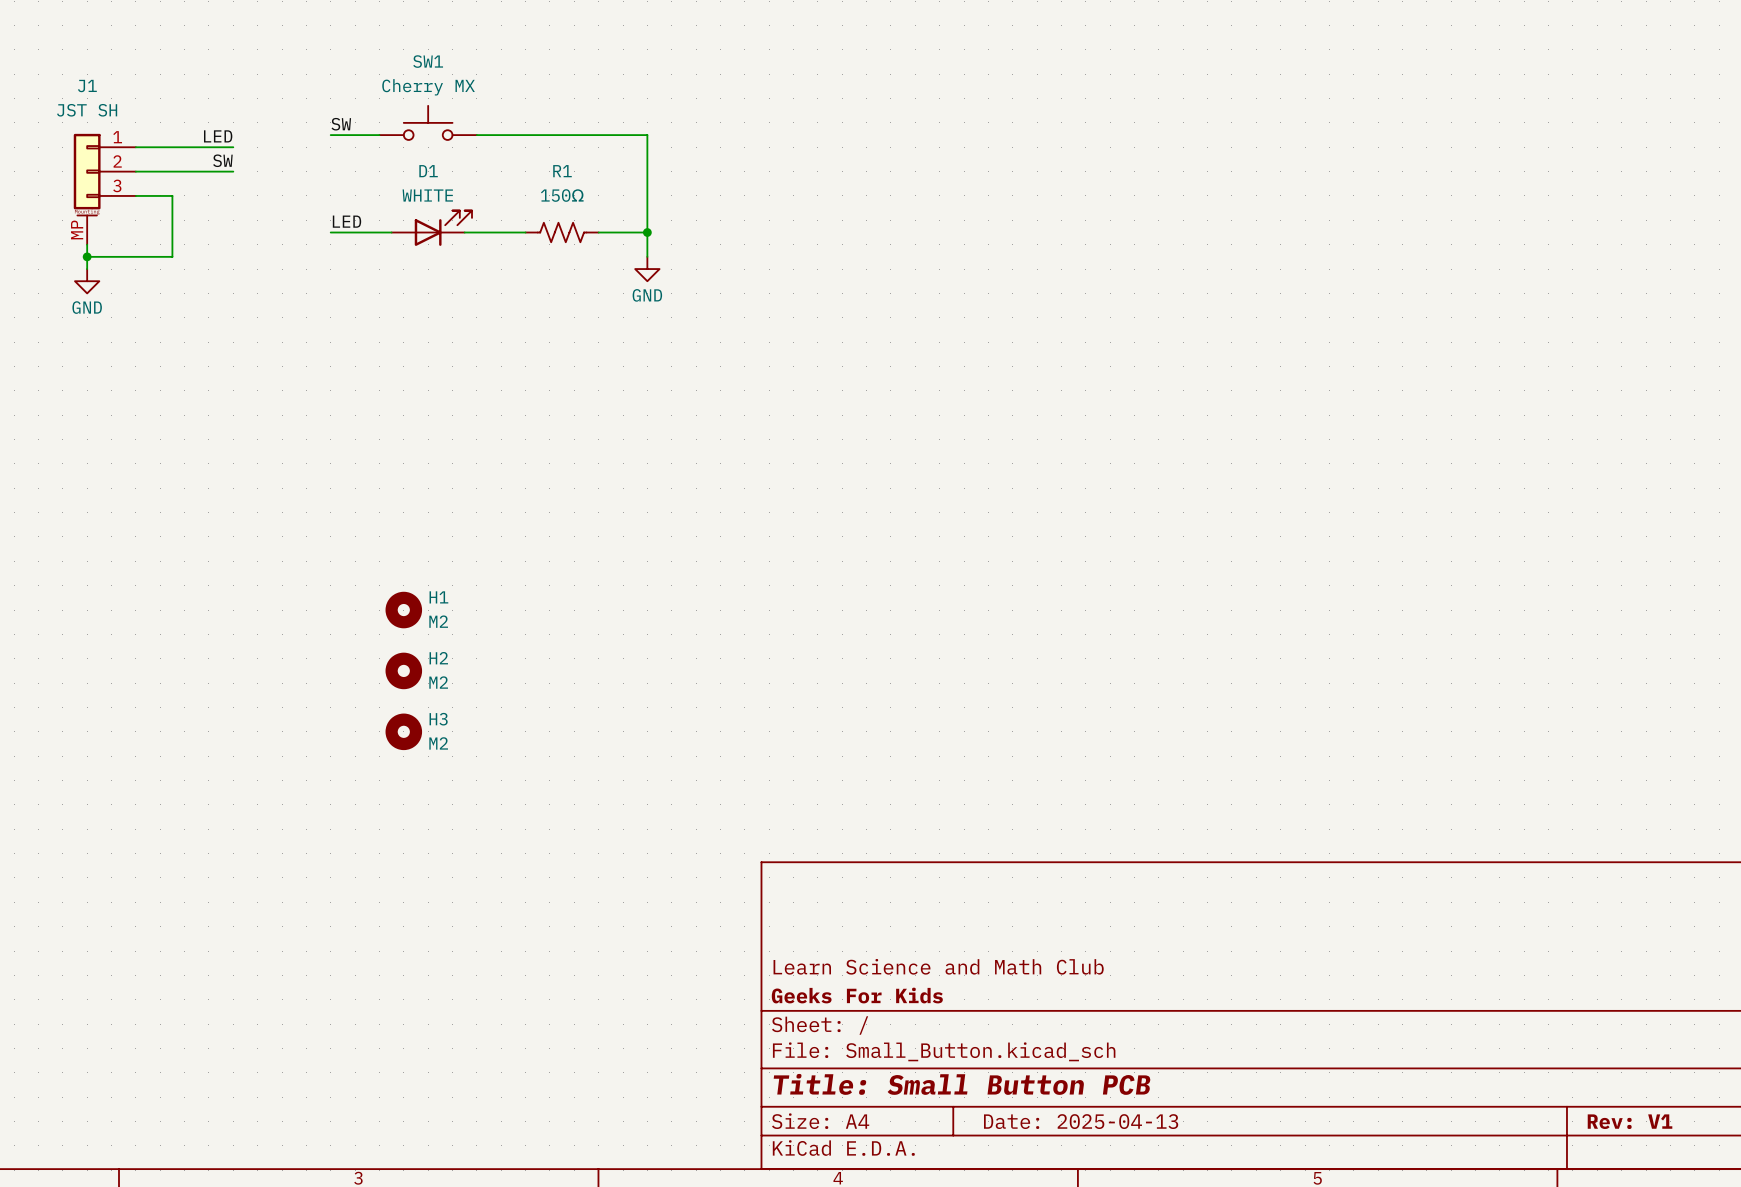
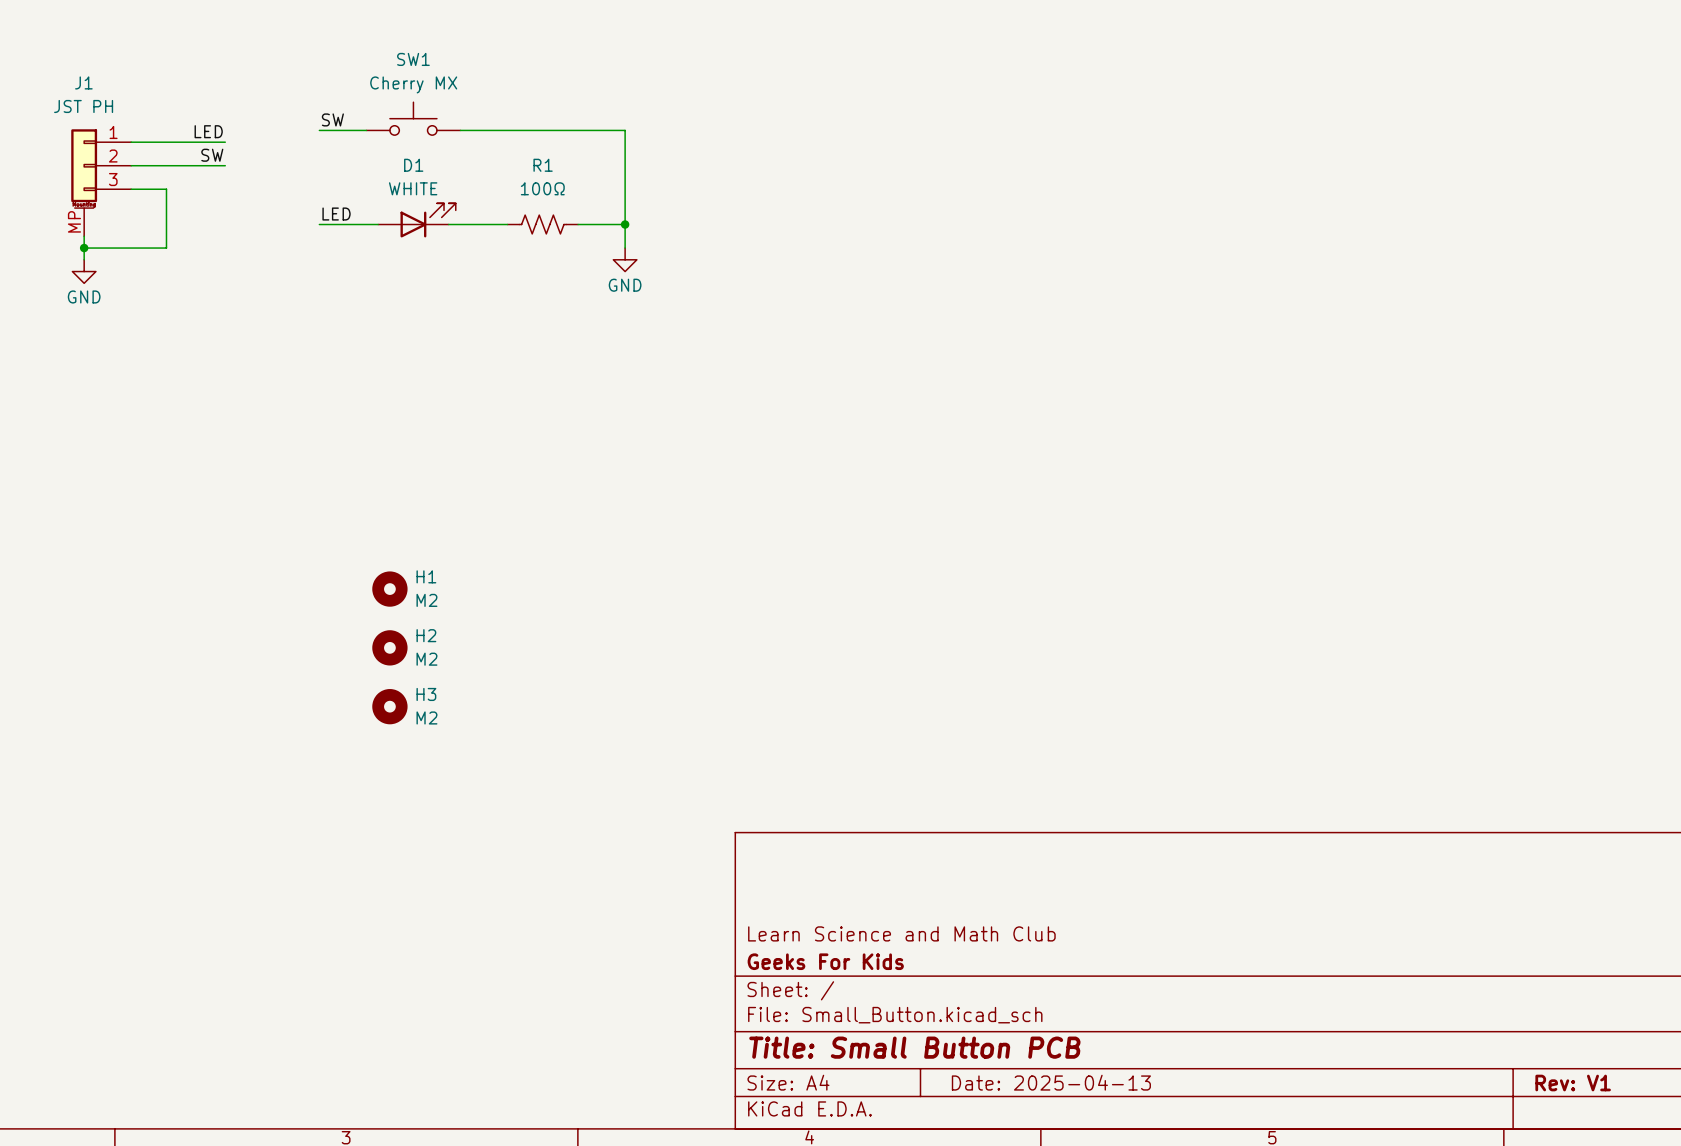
J1 value: JST SH (87, 110) -> JST PH (83, 106)
R1 value: 150Ω (562, 195) -> 100Ω (542, 188)

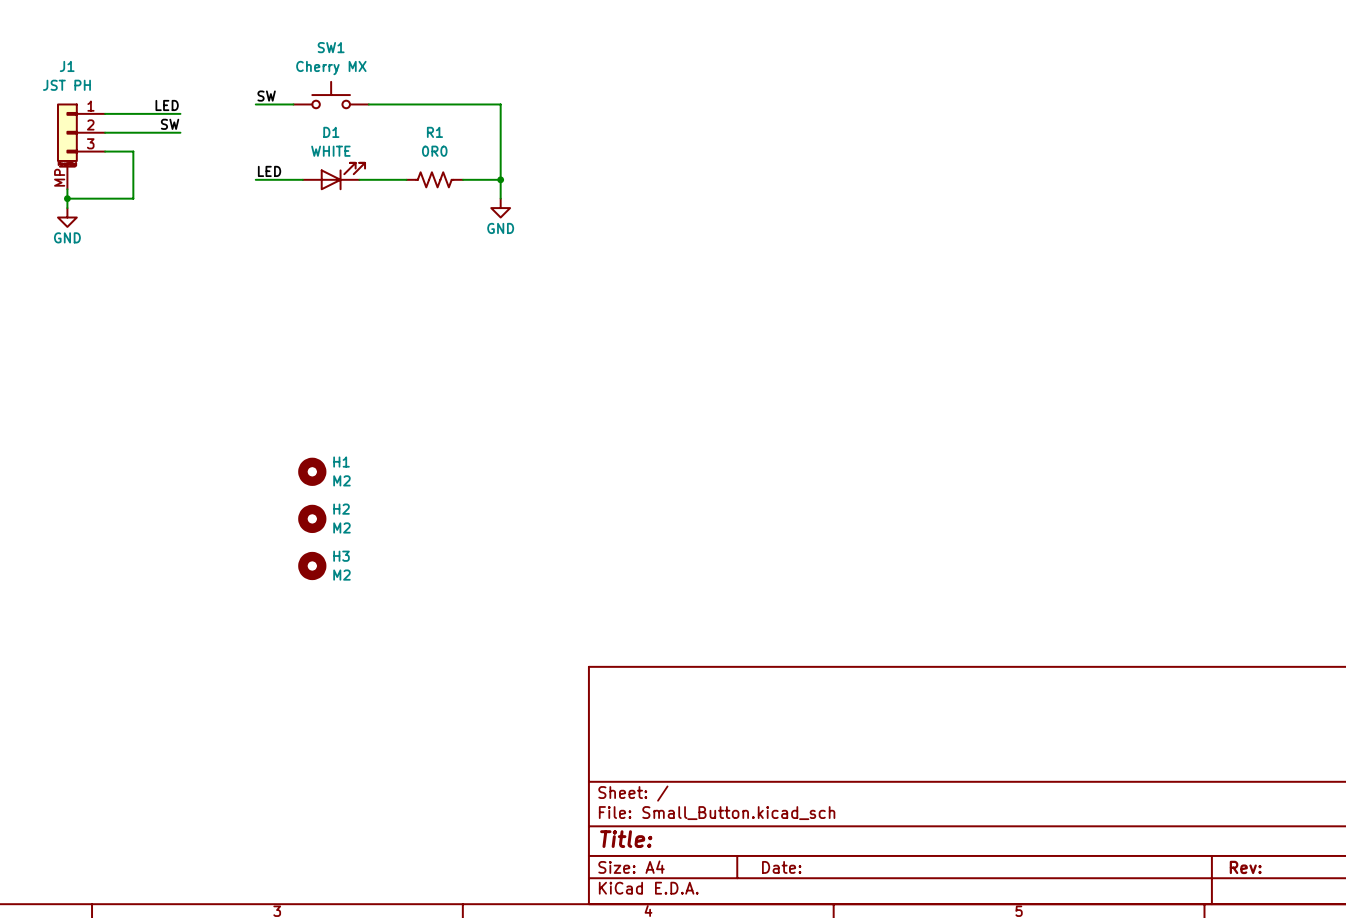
R1 value: 100Ω (542, 188) -> 0R0 (434, 151)
title block: Learn Science and Math Club (901, 933) -> none
title block: Geeks For Kids (825, 961) -> none
title block: Title: Small Button PCB (914, 1047) -> Title: (626, 839)
title block: Date: 2025-04-13 (1051, 1082) -> Date: (781, 867)
title block: Rev: V1 (1573, 1083) -> Rev: (1245, 867)

